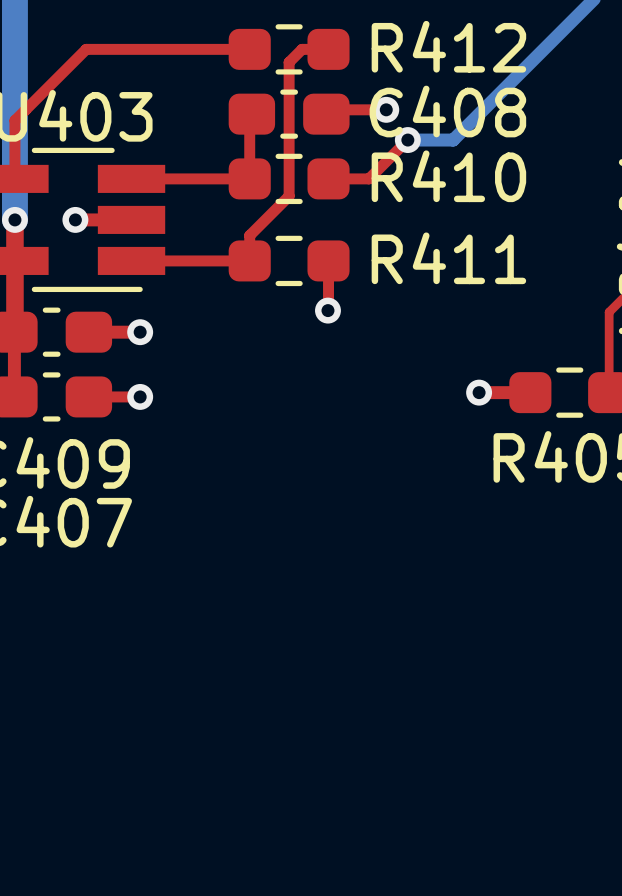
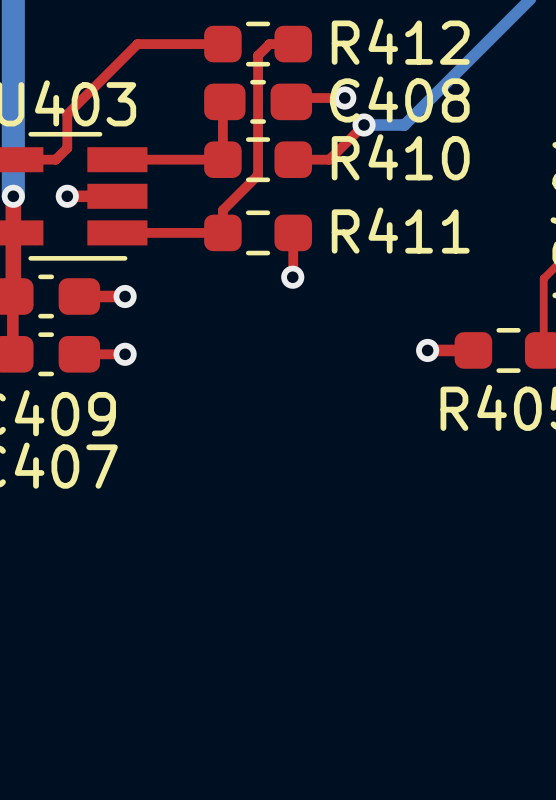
top track: (154, 49) (86, 49) (14, 120) (14, 178) -> (137, 44) (67, 114) (67, 148) (55, 159) (13, 159)

